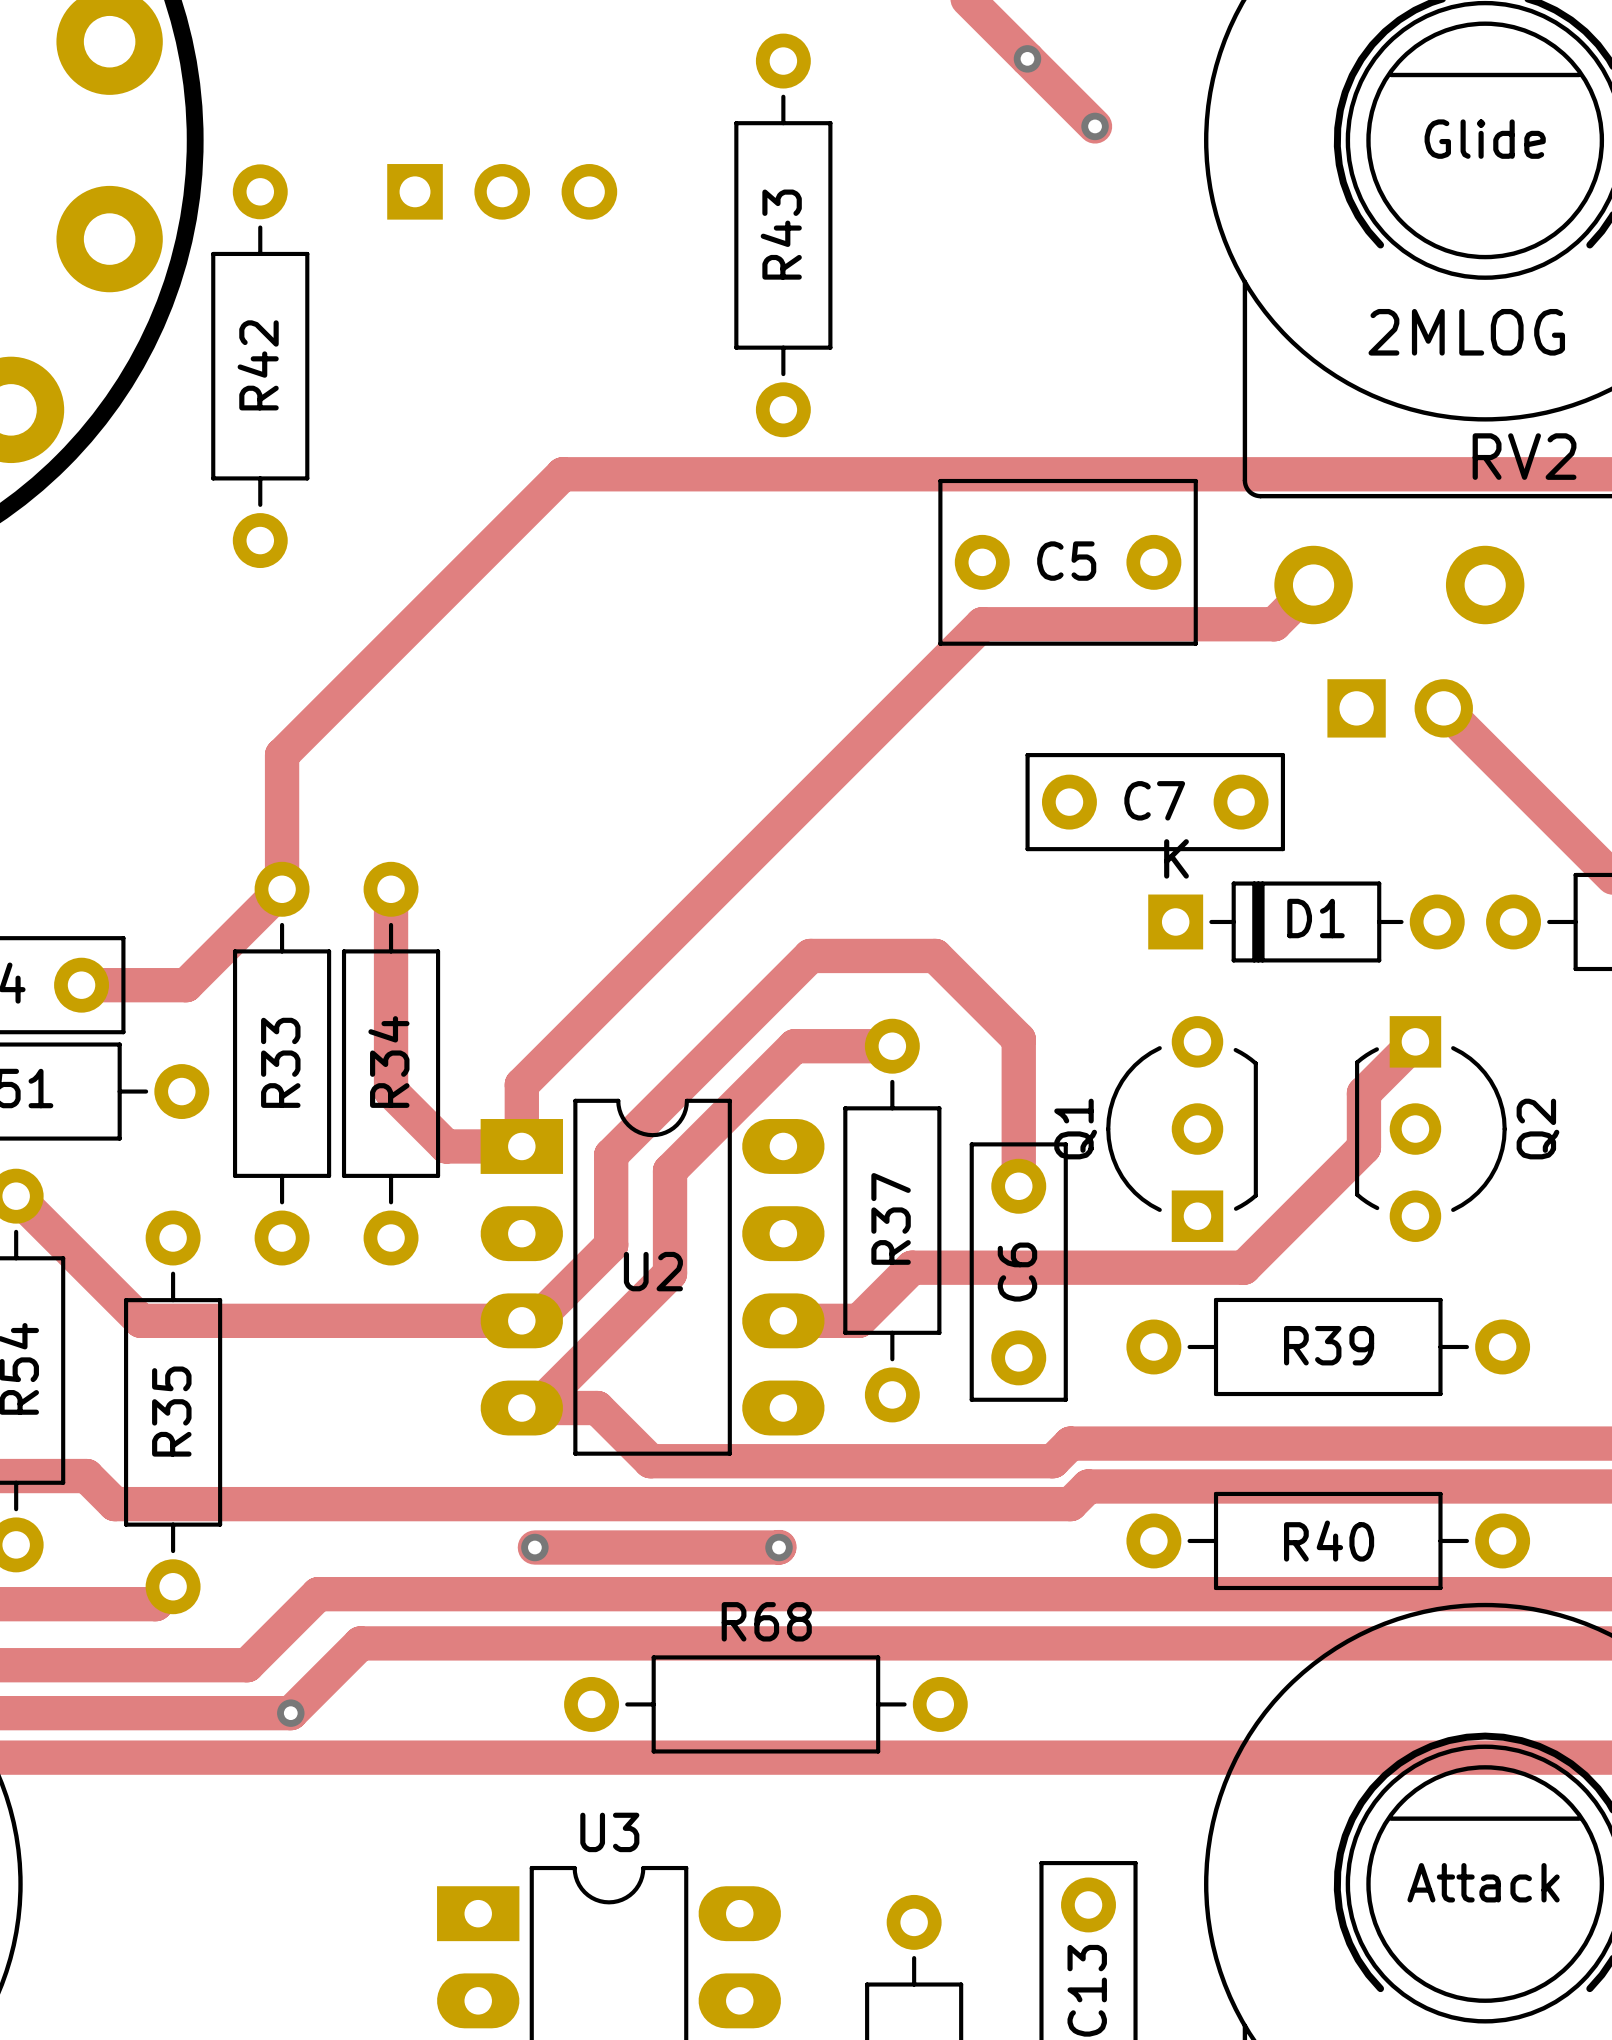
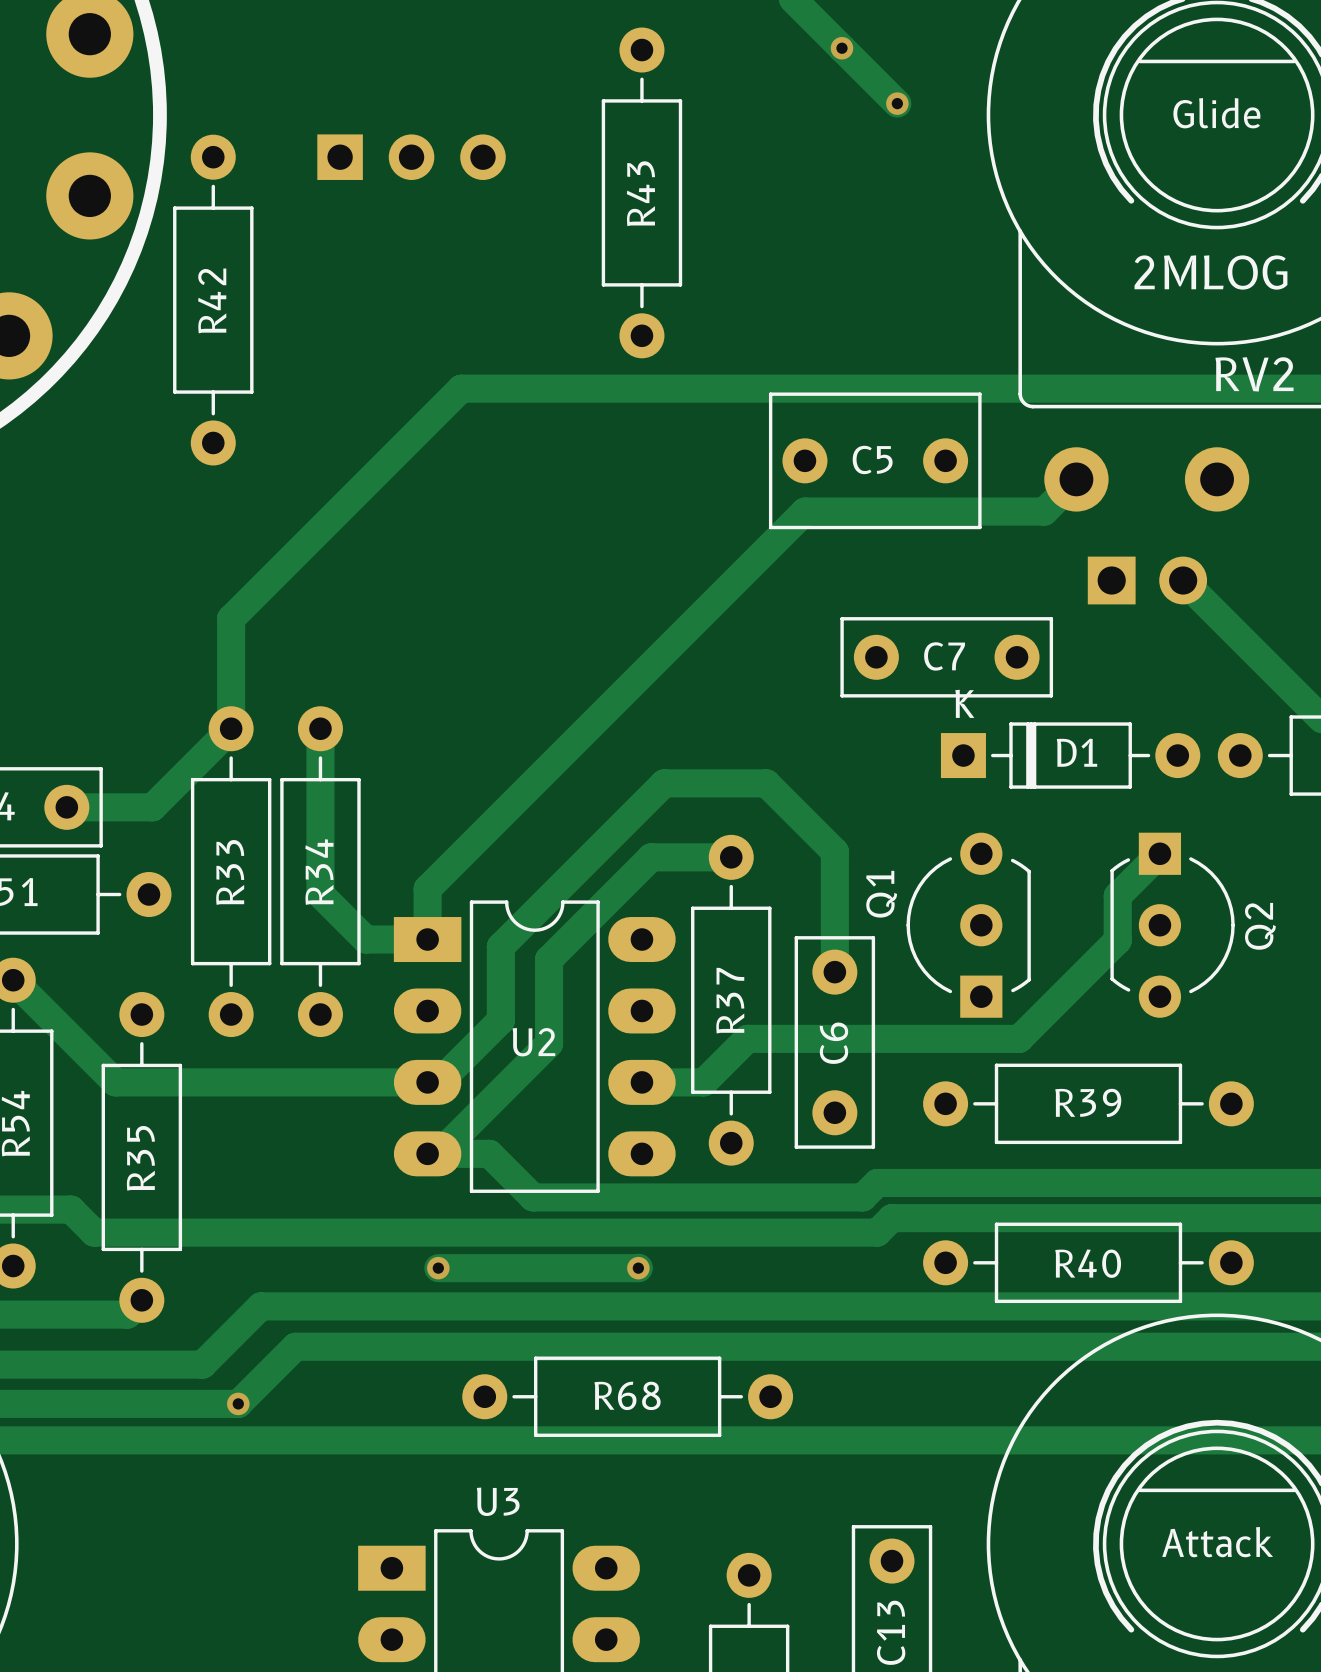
Q1 name position: Q1 (1075, 1129) -> Q1 (881, 894)
R68 name position: R68 (766, 1621) -> R68 (627, 1395)

